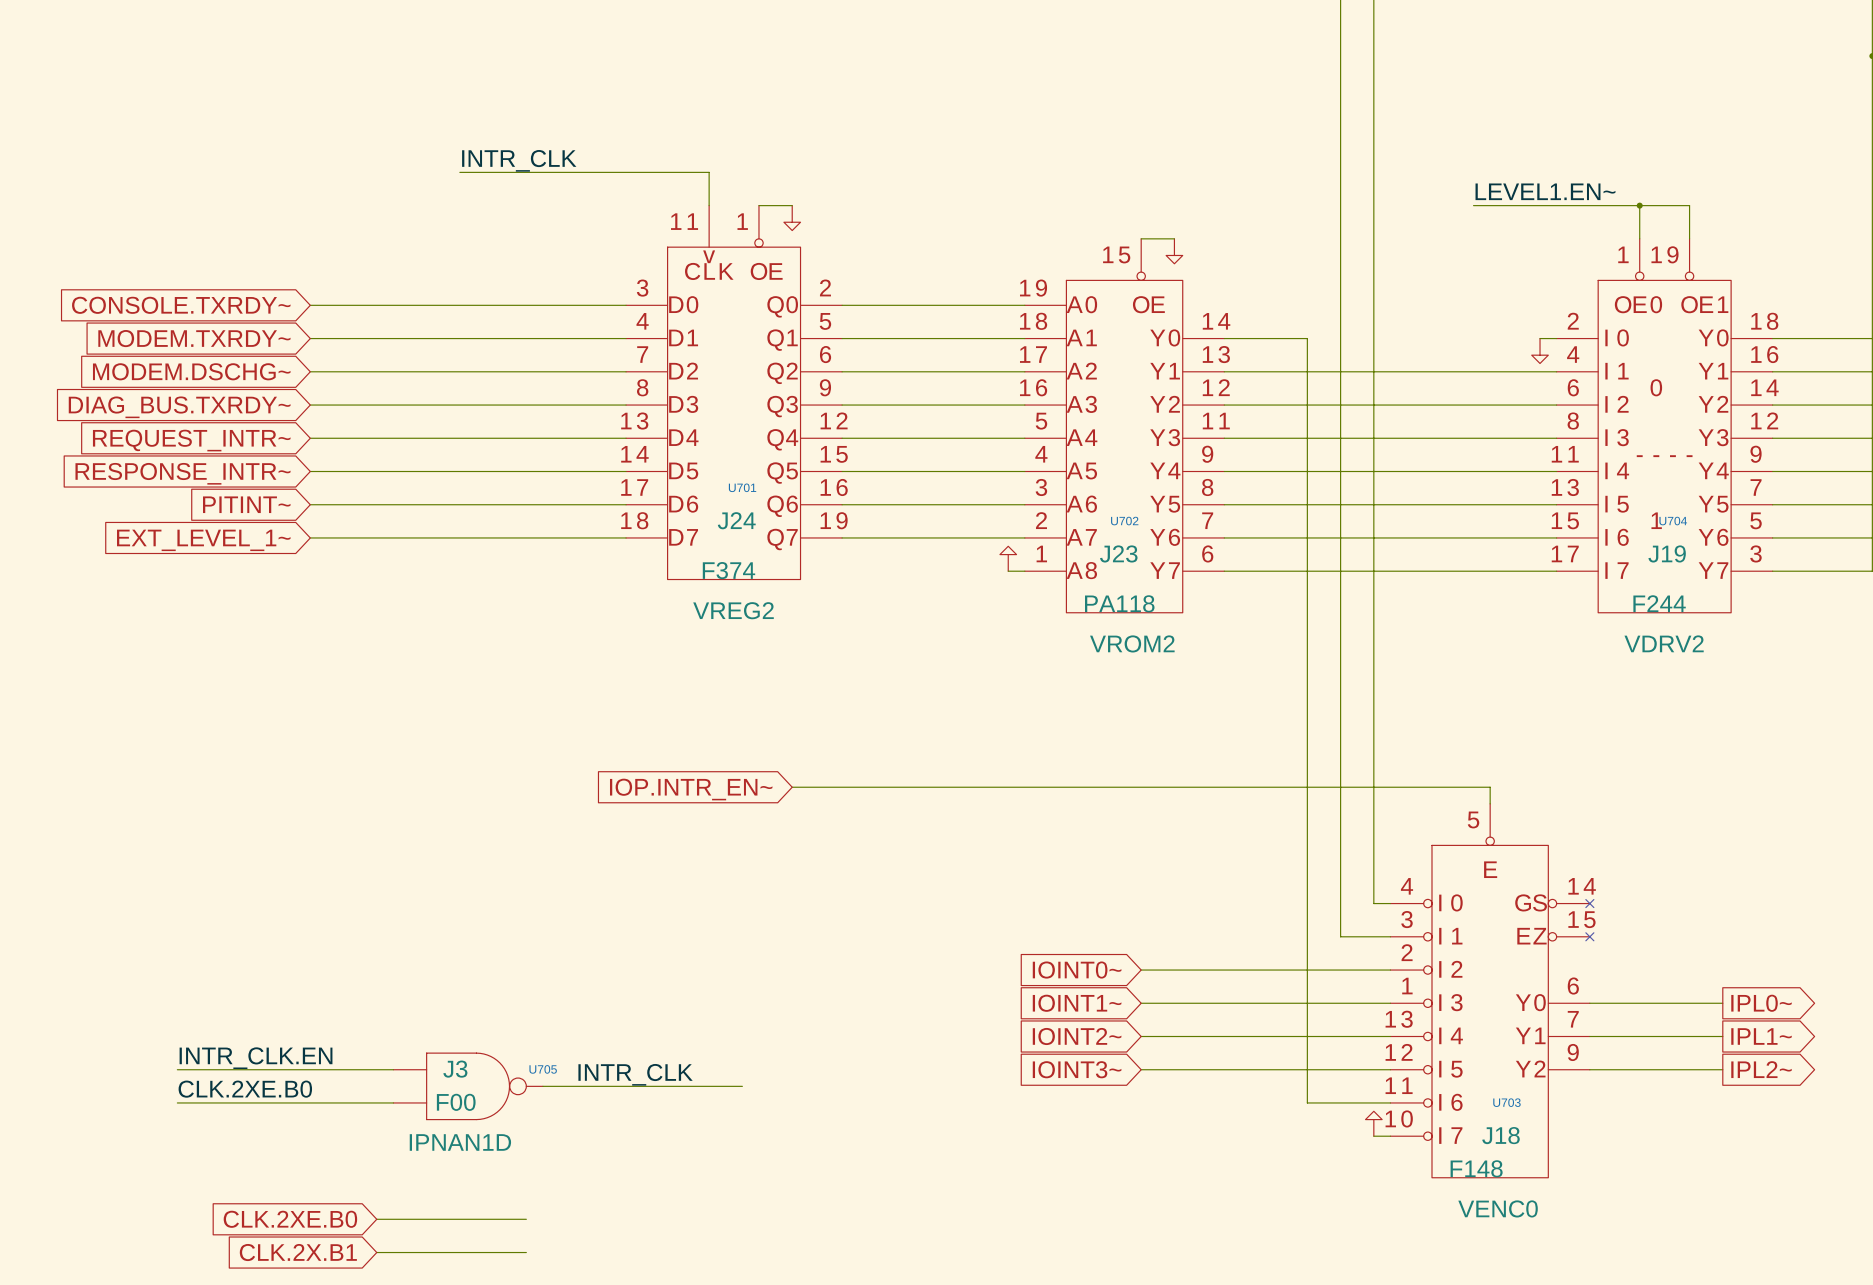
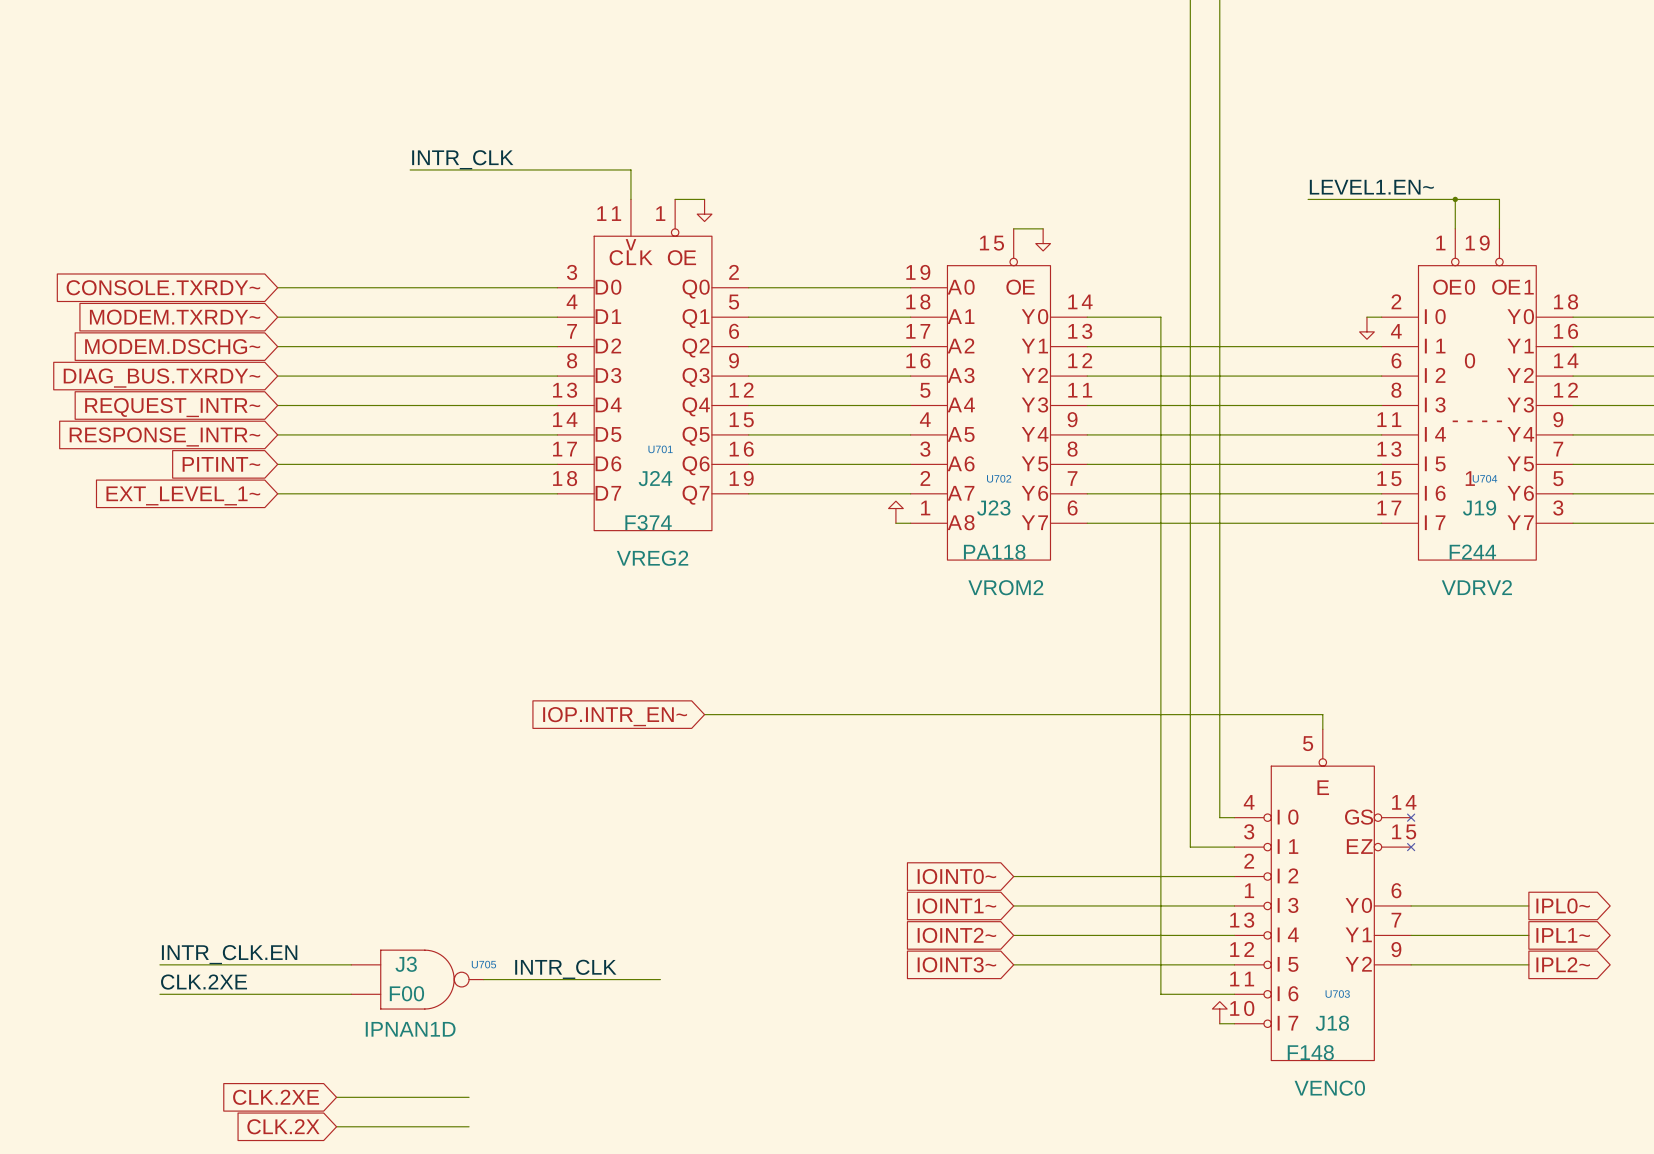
label: CLK.2XE.B0 (245, 1089) -> CLK.2XE (204, 982)
global label: CLK.2XE.B0 (290, 1219) -> CLK.2XE (276, 1097)
global label: CLK.2X.B1 (298, 1252) -> CLK.2X (283, 1126)

